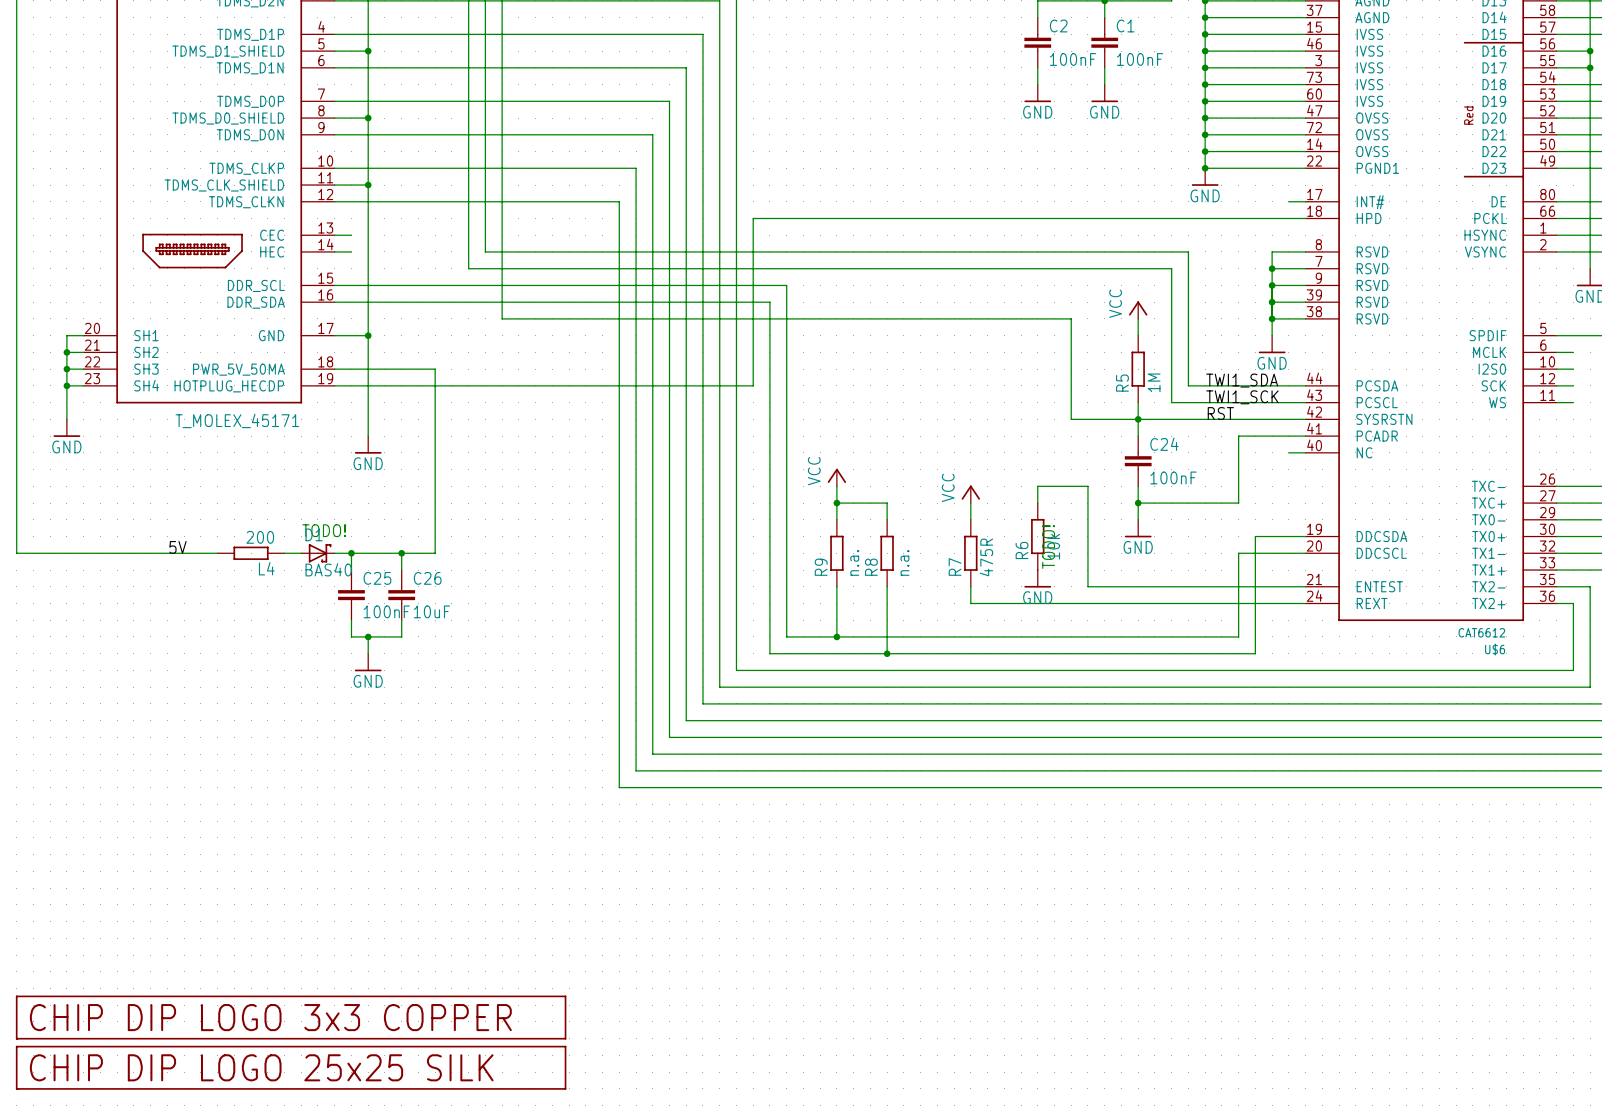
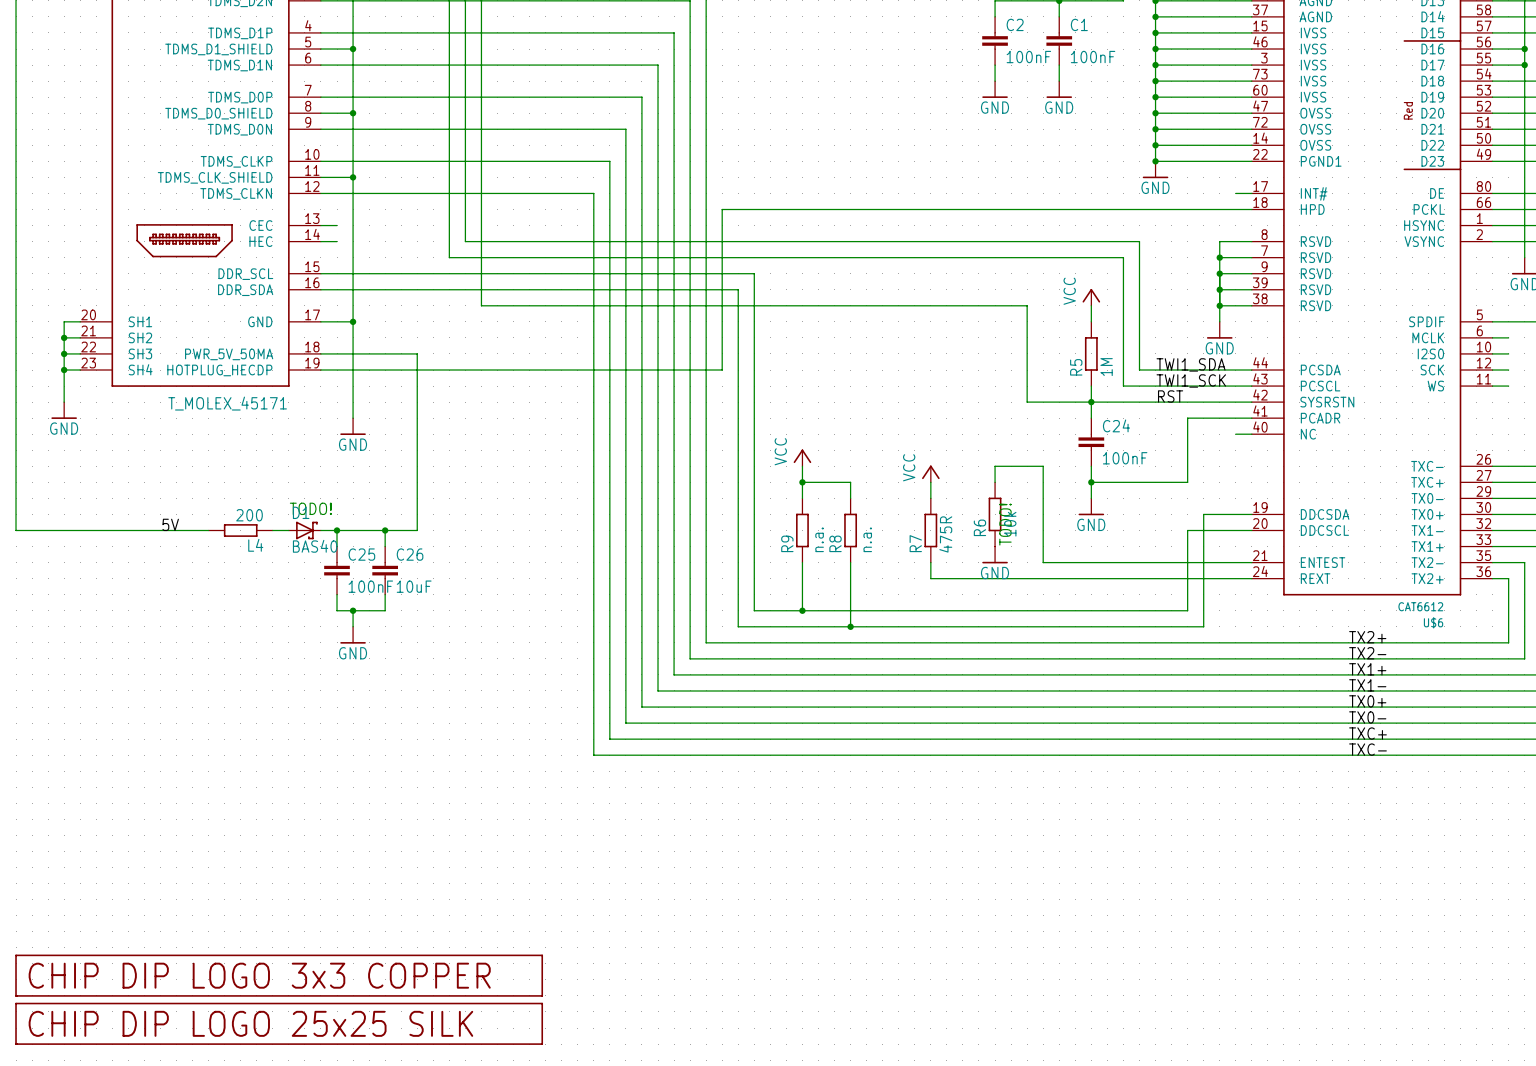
label: none -> TX2+ (1367, 637)
label: none -> TX2- (1367, 653)
label: none -> TX1+ (1367, 669)
label: none -> TX1- (1367, 685)
label: none -> TX0+ (1367, 701)
label: none -> TX0- (1367, 717)
label: none -> TXC+ (1367, 733)
label: none -> TXC- (1367, 749)

